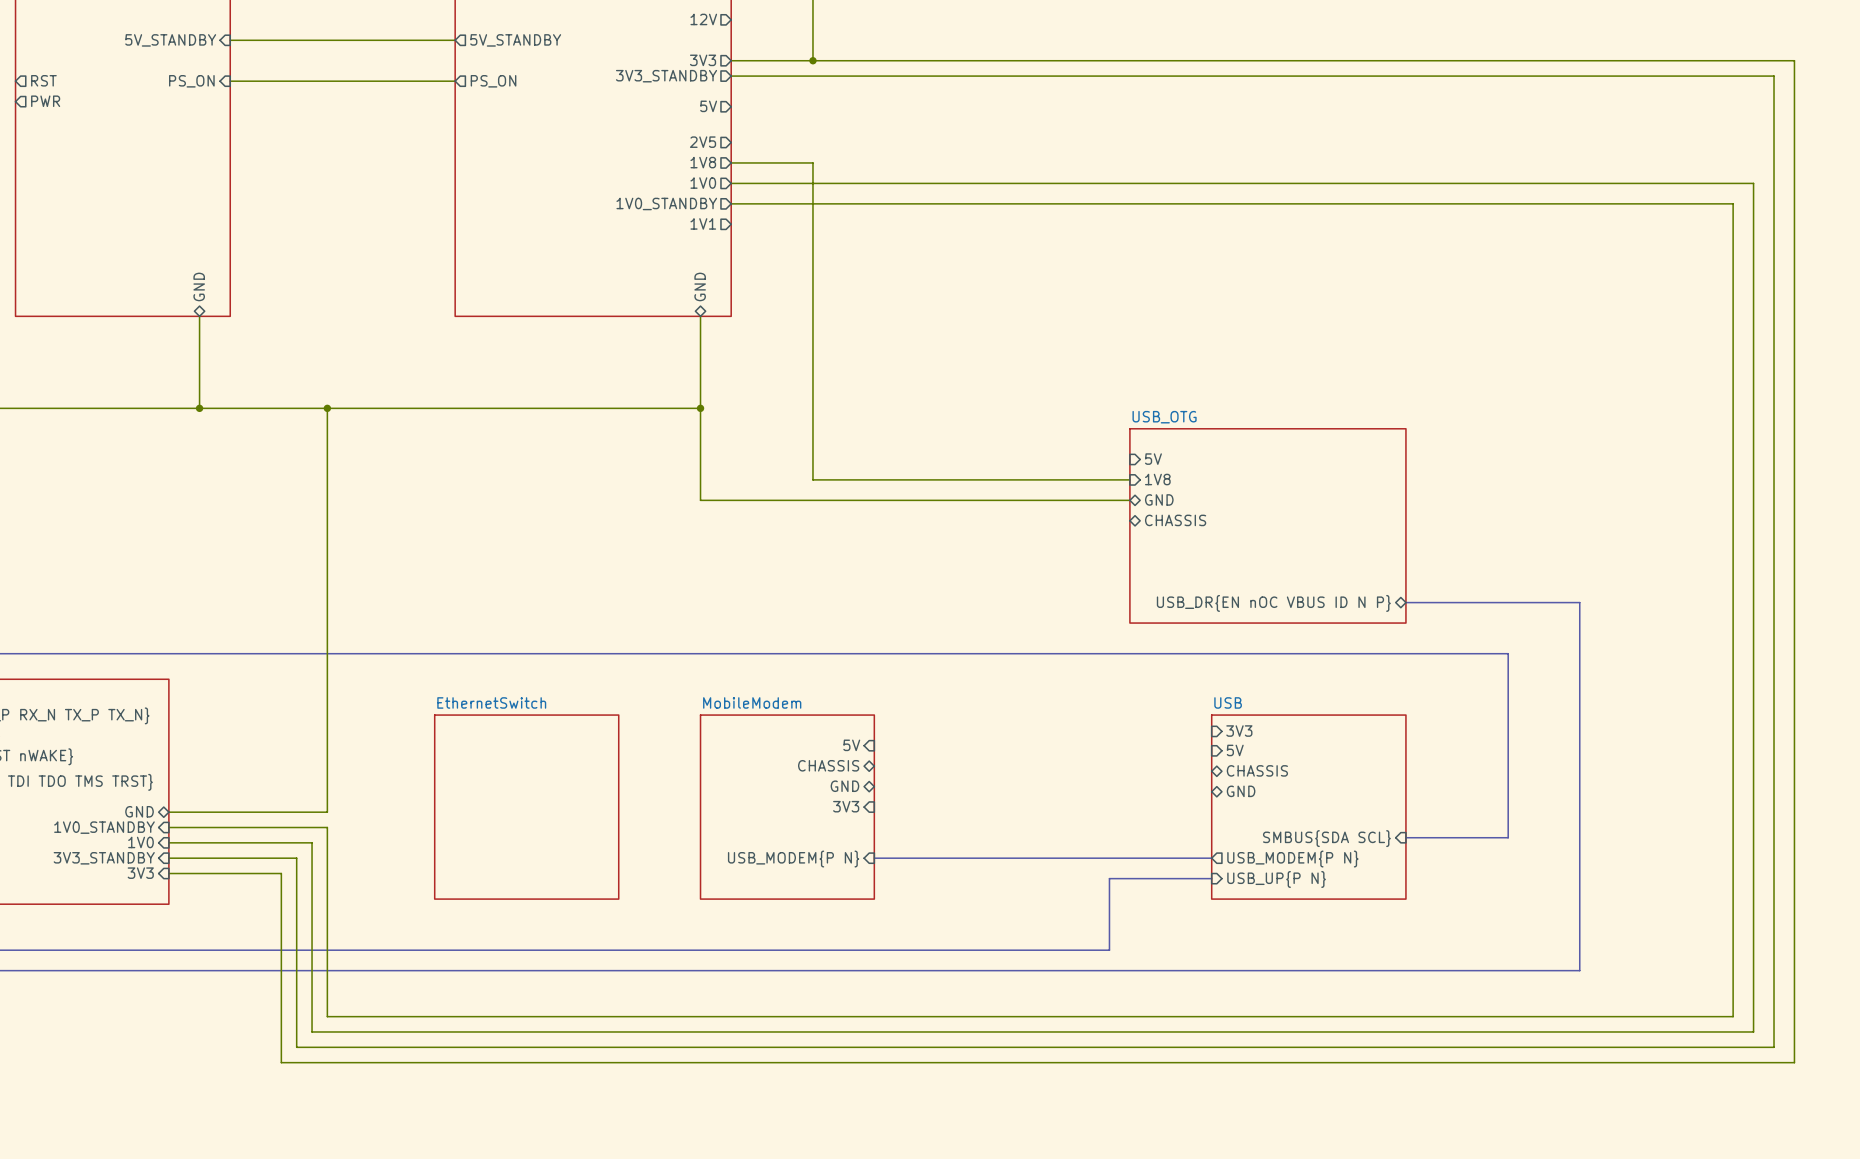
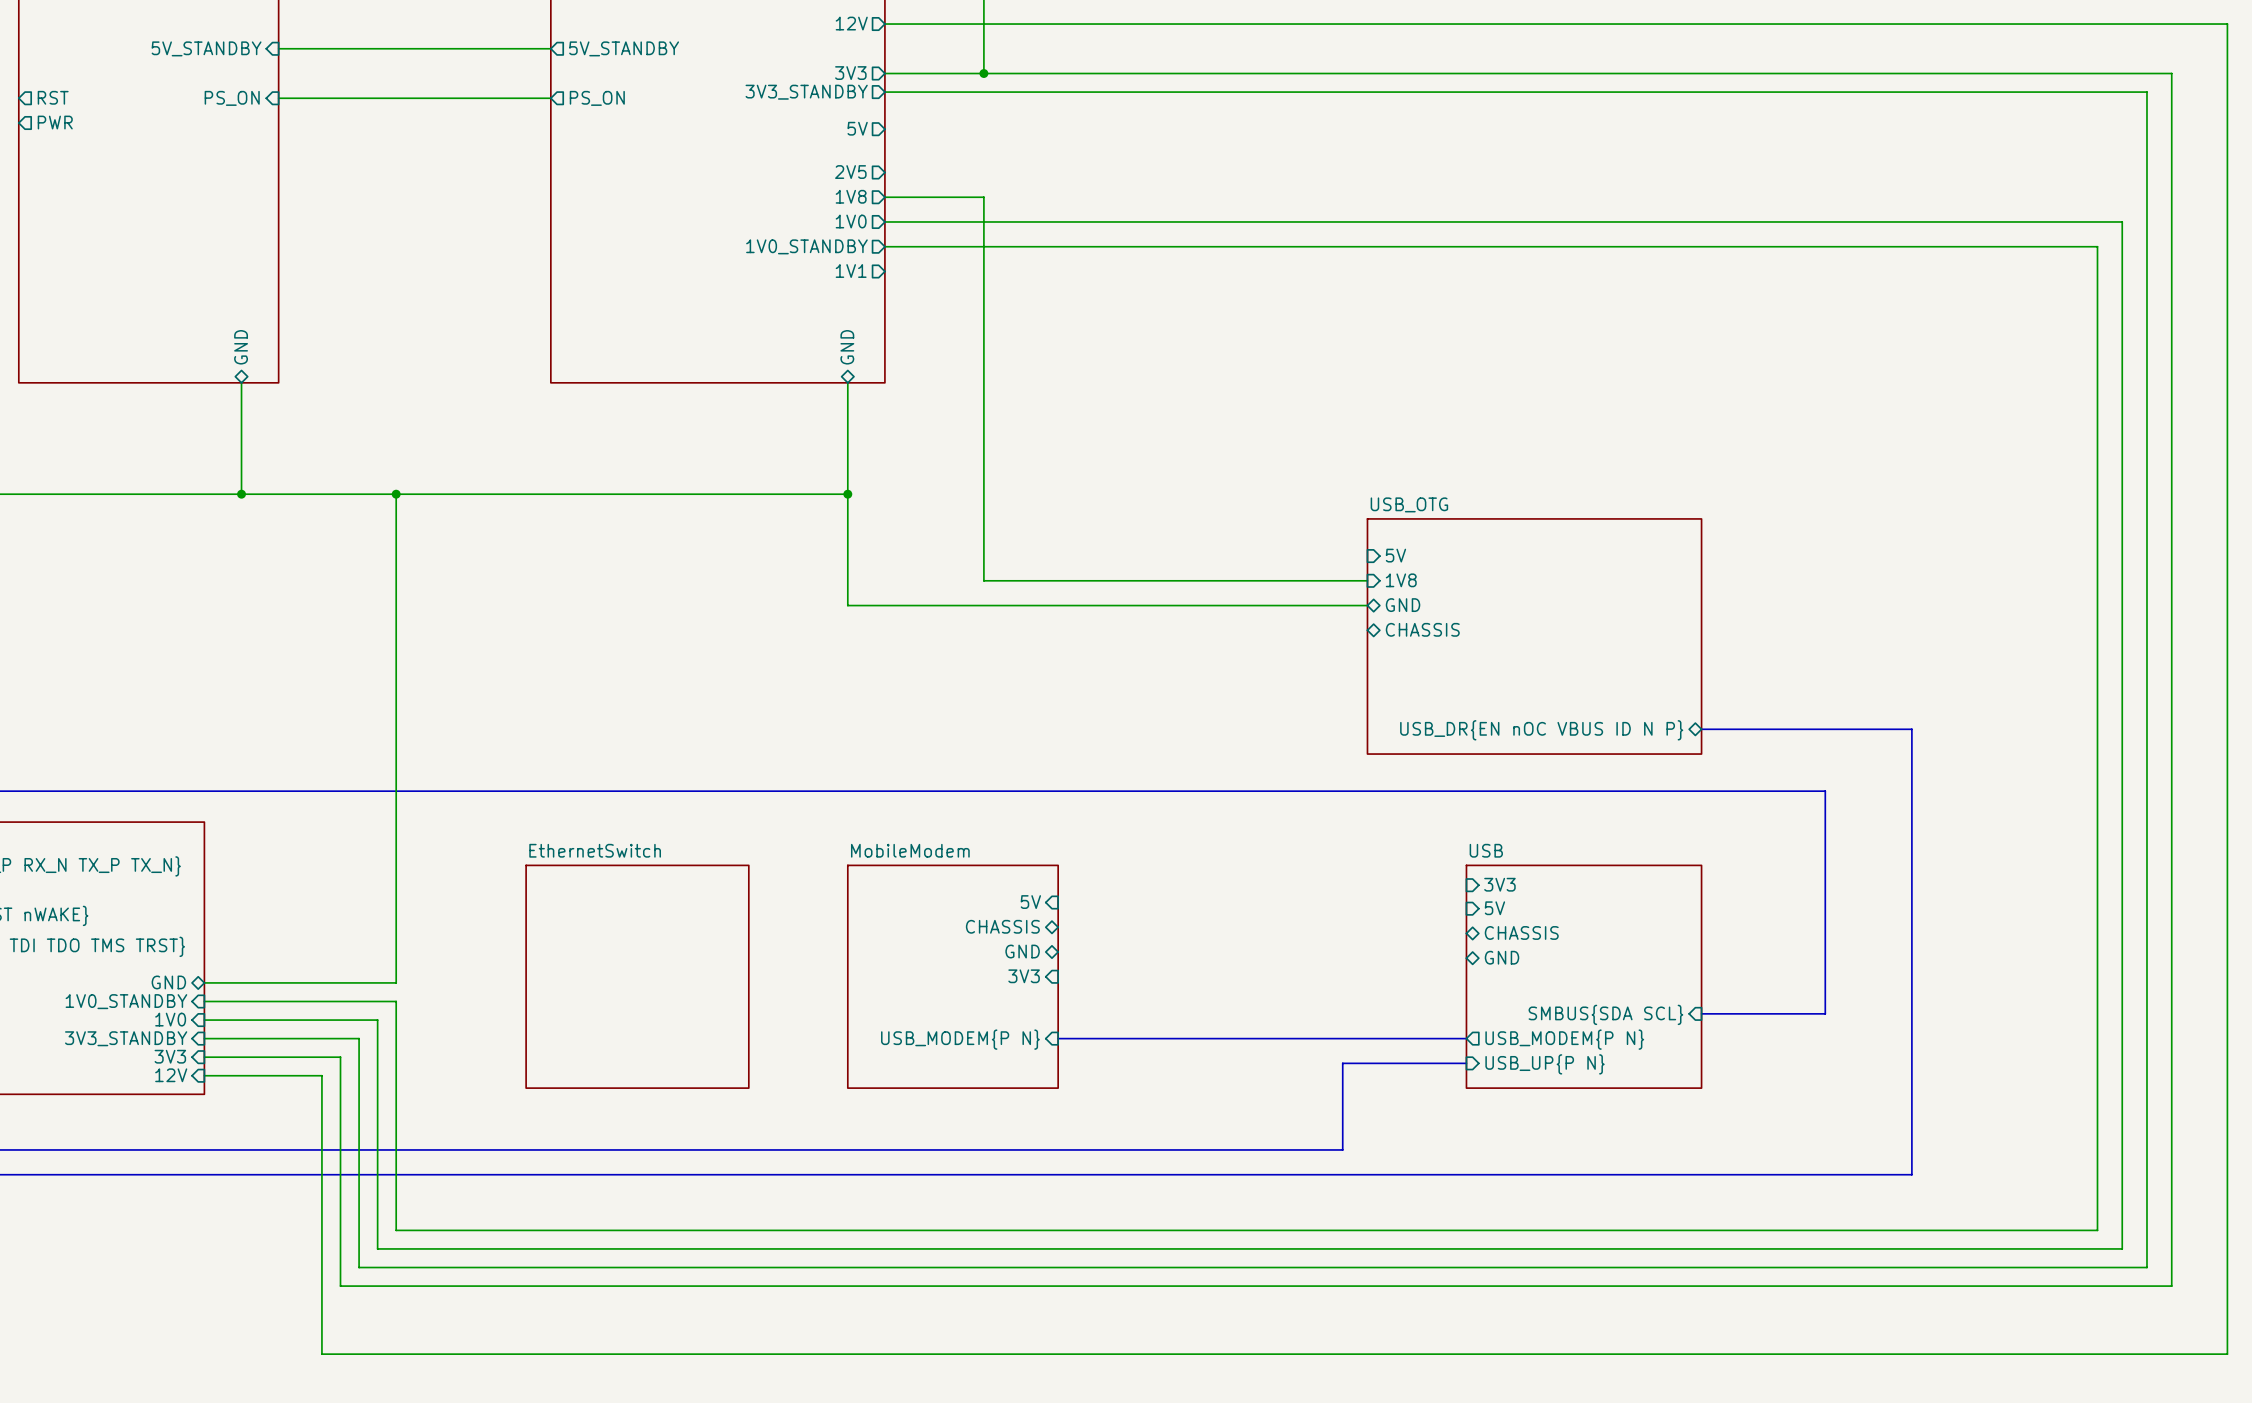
wire: none -> (884, 24) (2227, 24) (2227, 1354) (321, 1354) (321, 1075) (204, 1075)
sheet pin: none -> 12V (171, 1075)

